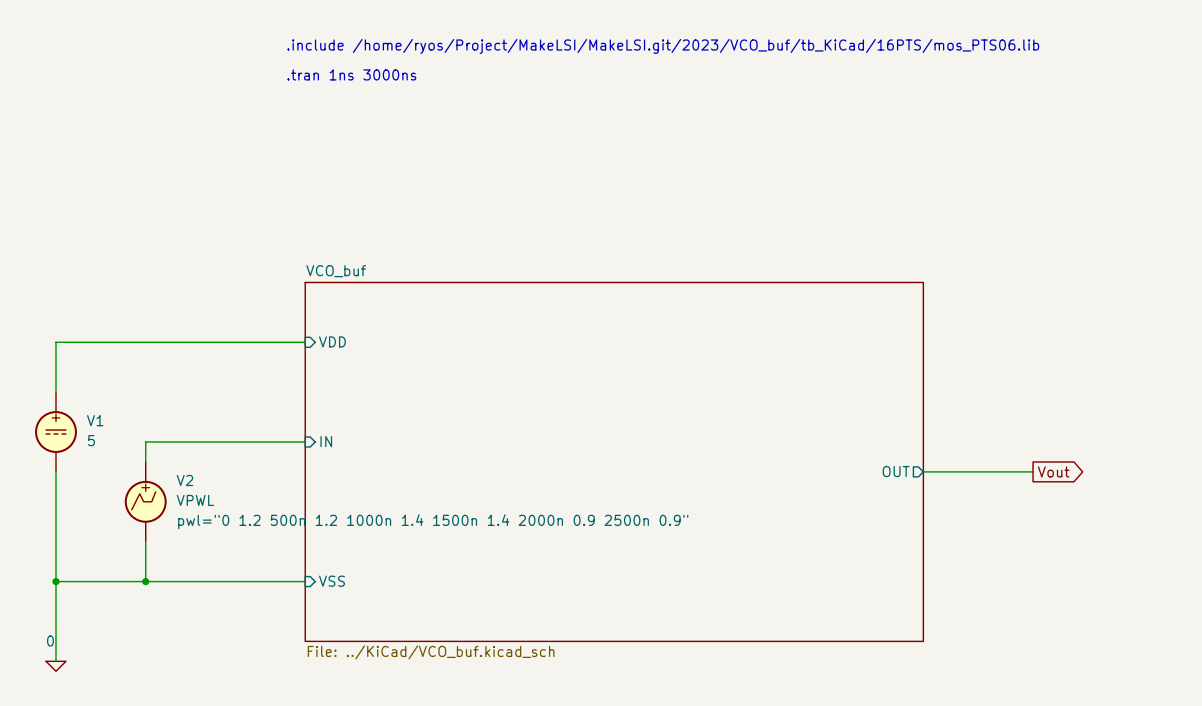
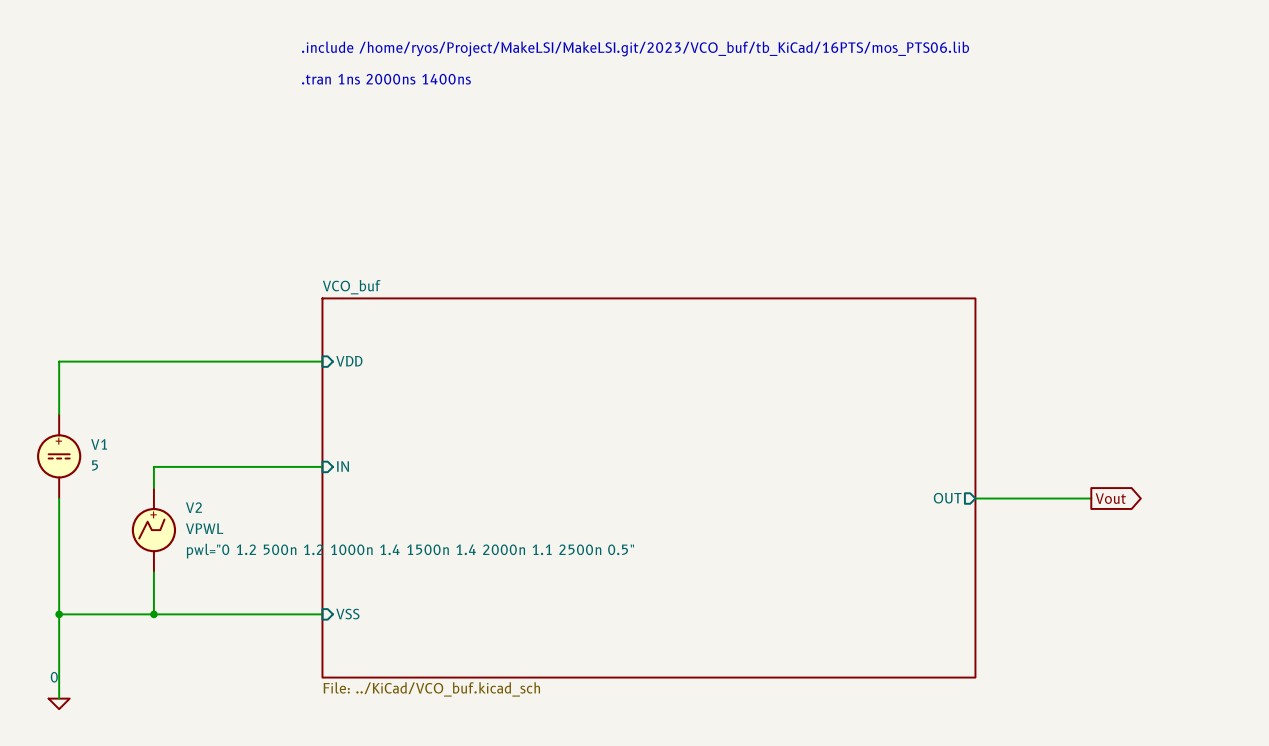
text: .tran 1ns 3000ns (351, 74) -> .tran 1ns 2000ns 1400ns (386, 79)
V2 text: pwl="0 1.2 500n 1.2 1000n 1.4 1500n 1.4 2000n 0.9 2500n 0.9" (433, 521) -> pwl="0 1.2 500n 1.2 1000n 1.4 1500n 1.4 2000n 1.1 2500n 0.5" (410, 551)

